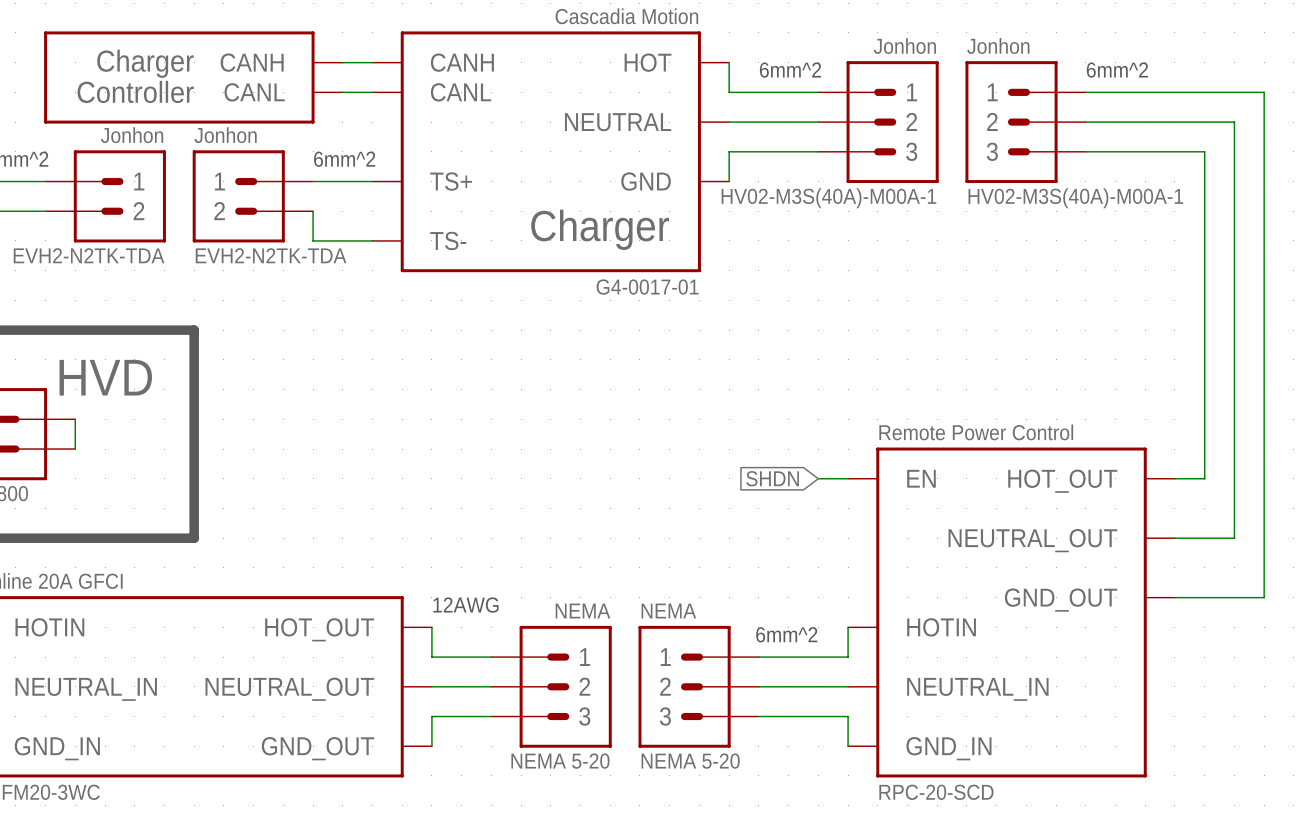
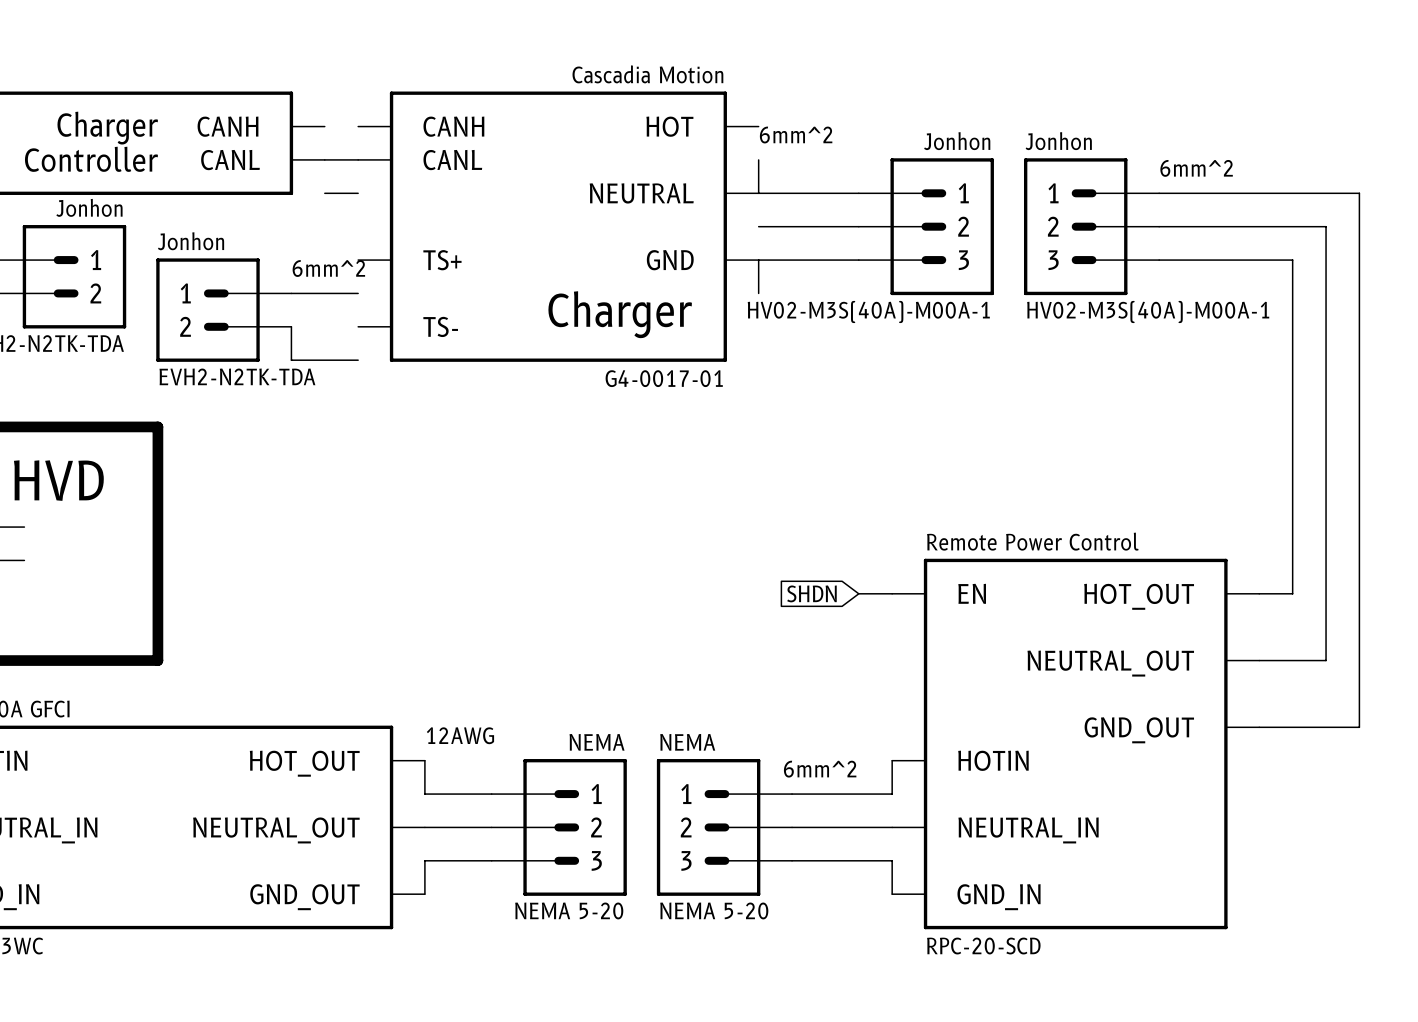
wire: (342, 62) (372, 62) -> (324, 193) (358, 193)
wire: (729, 62) (729, 92) (818, 92) -> none
text position: 6mm^2 (790, 70) -> 6mm^2 (796, 135)
text position: 6mm^2 (1117, 70) -> 6mm^2 (1196, 168)
wire: (1085, 92) (1264, 92) (1264, 122) -> (1326, 193) (1359, 193)
part position: (878, 122) -> (926, 226)
part position: (1025, 122) -> (1091, 226)
wire: (1234, 122) (1234, 151) -> (1292, 226) (1326, 226)
wire: (729, 151) (729, 181) -> (758, 159) (758, 193)
wire: (1204, 151) (1204, 181) -> (1159, 260) (1292, 260)
text position: 6mm^2 (344, 159) -> 6mm^2 (328, 268)
wire: (313, 181) (372, 181) -> none
wire: none -> (858, 260) (758, 260) (758, 293)
part position: (252, 196) -> (223, 310)
wire: (313, 211) (313, 240) (372, 240) -> (291, 293) (358, 293)
wire: none -> (291, 326) (291, 360) (358, 360)
wire: (75, 419) (75, 449) -> none

